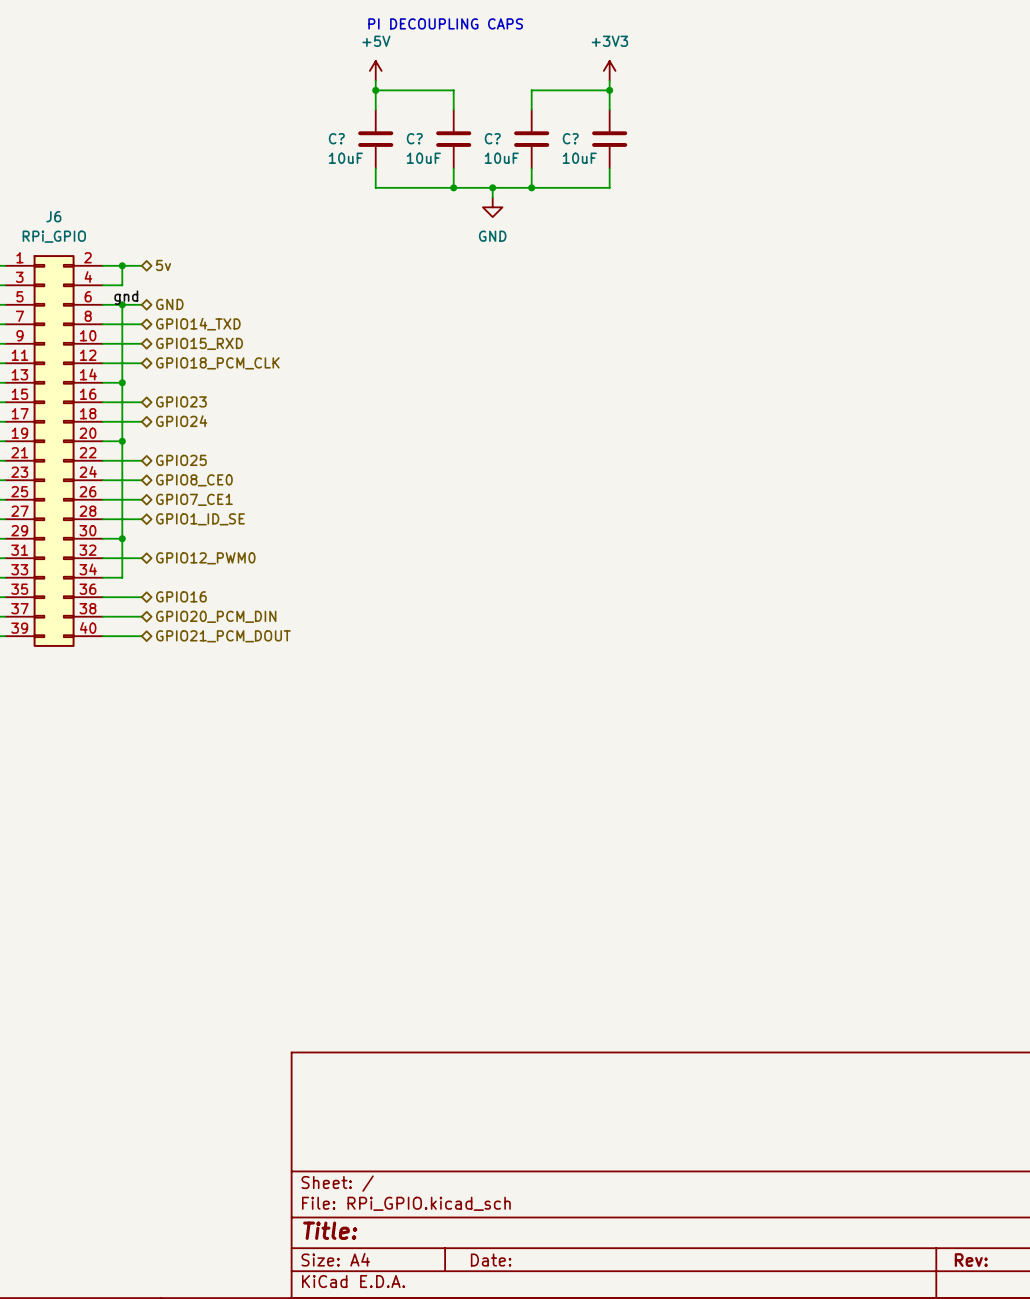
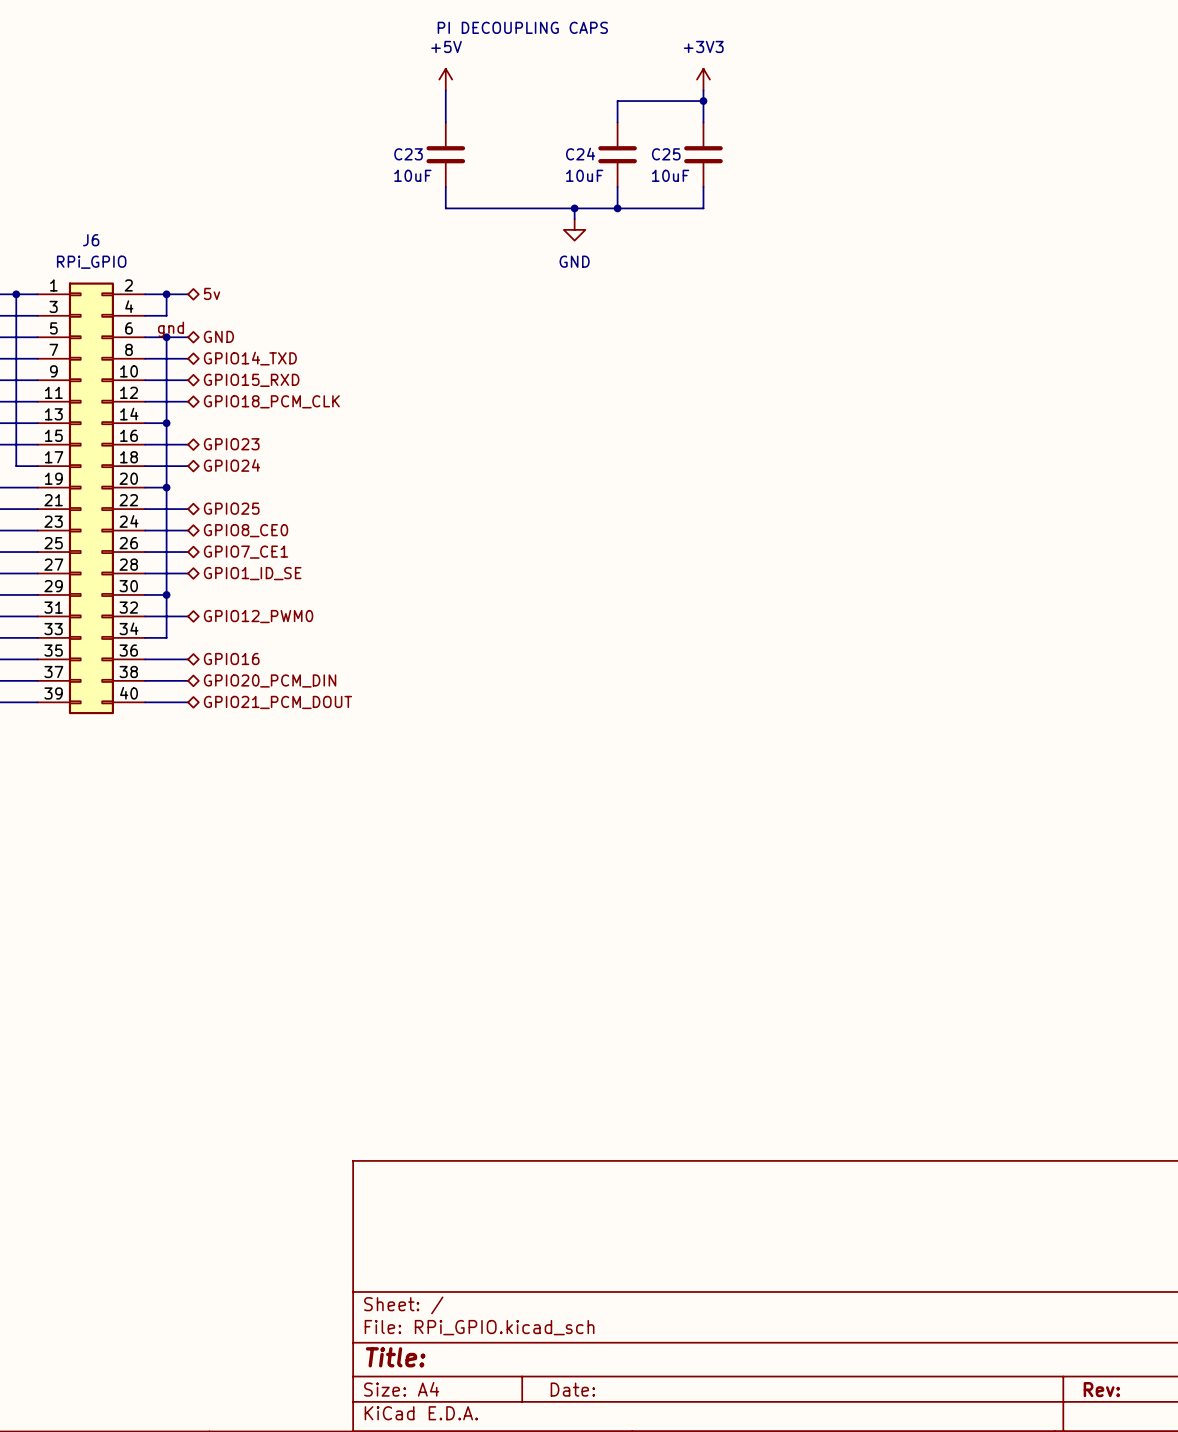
wire: (375, 90) (453, 90) (453, 109) -> none
junction: (375, 90) -> none
C? name: C? (336, 138) -> C23 (408, 154)
C? name: C? (492, 138) -> C24 (580, 154)
C? name: C? (570, 138) -> C25 (666, 154)
C?: 10uF (453, 139) -> none
wire: (453, 168) (453, 187) -> none
junction: (453, 187) -> none

